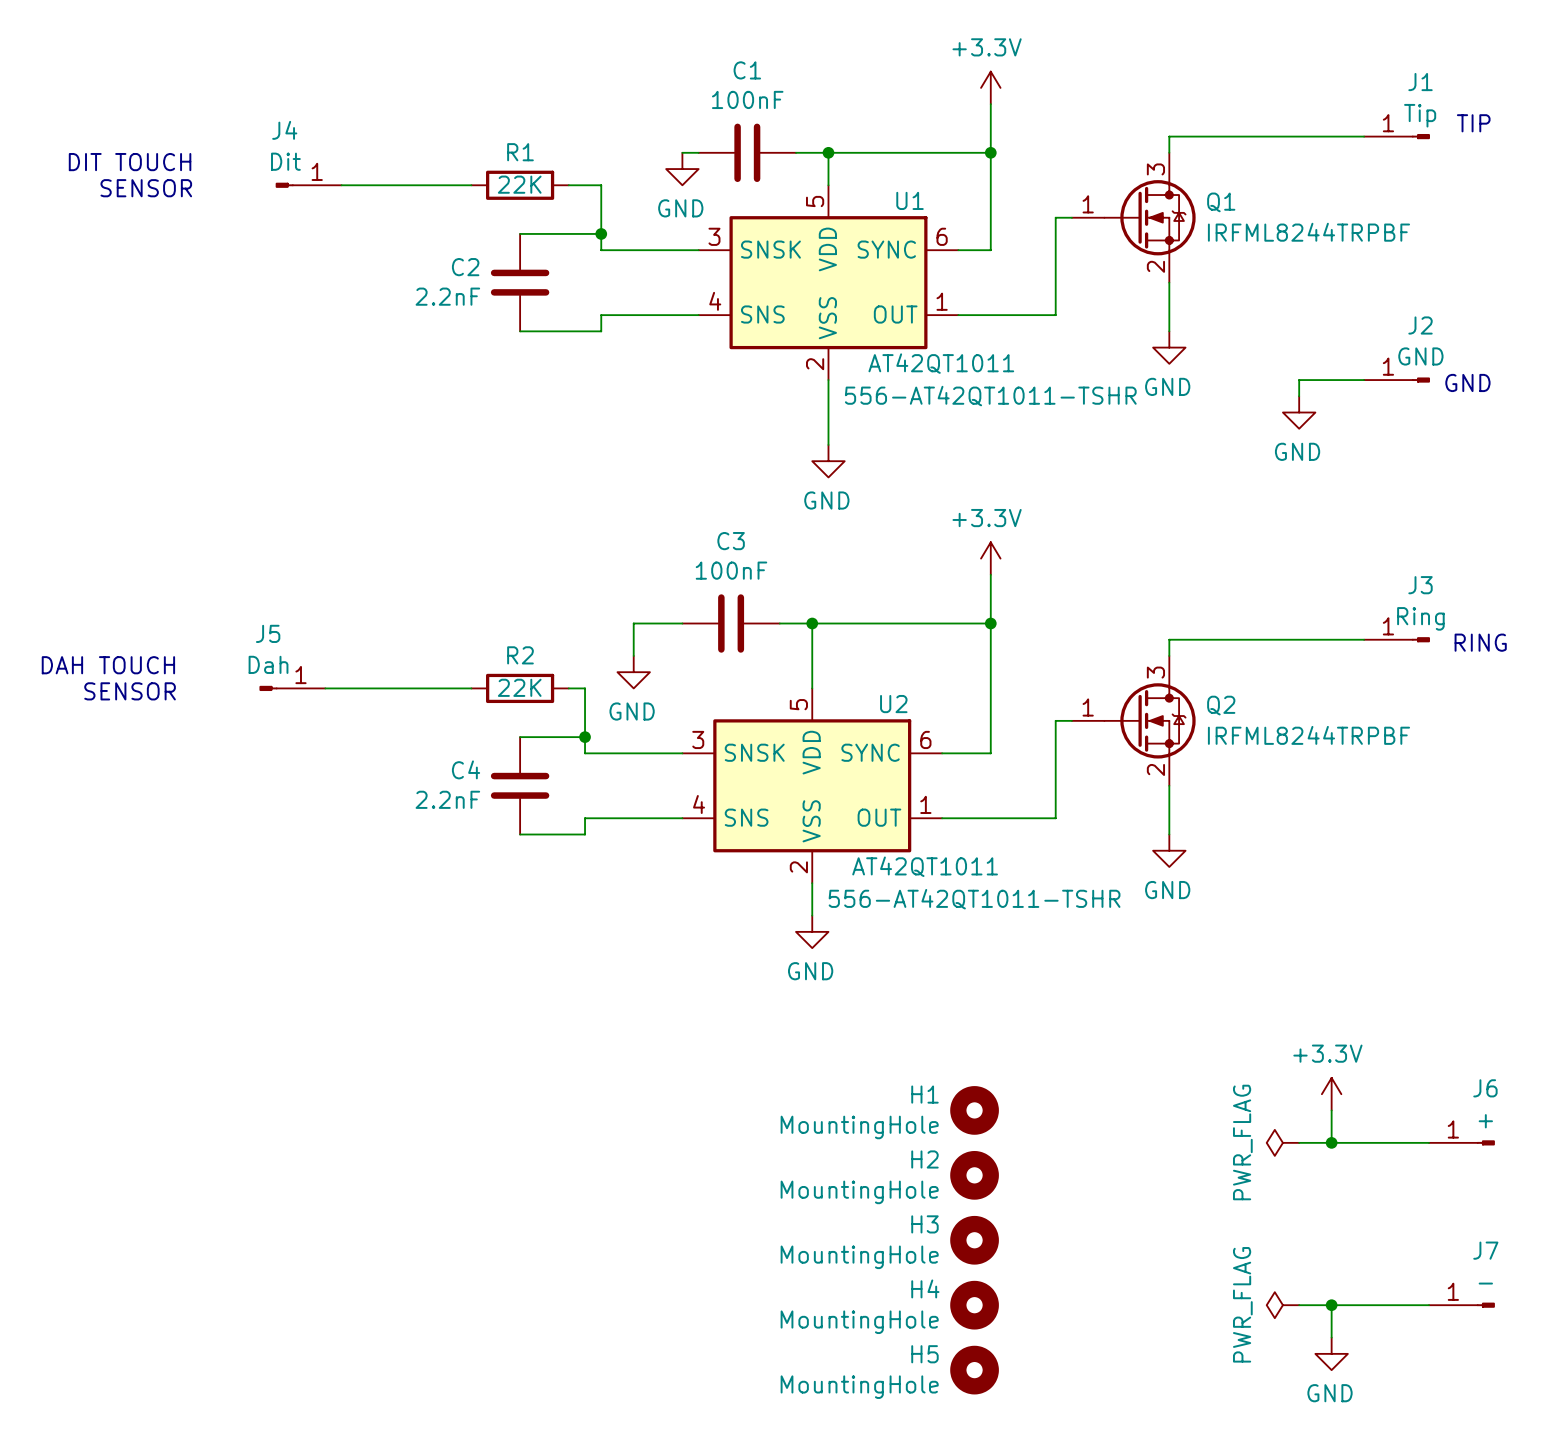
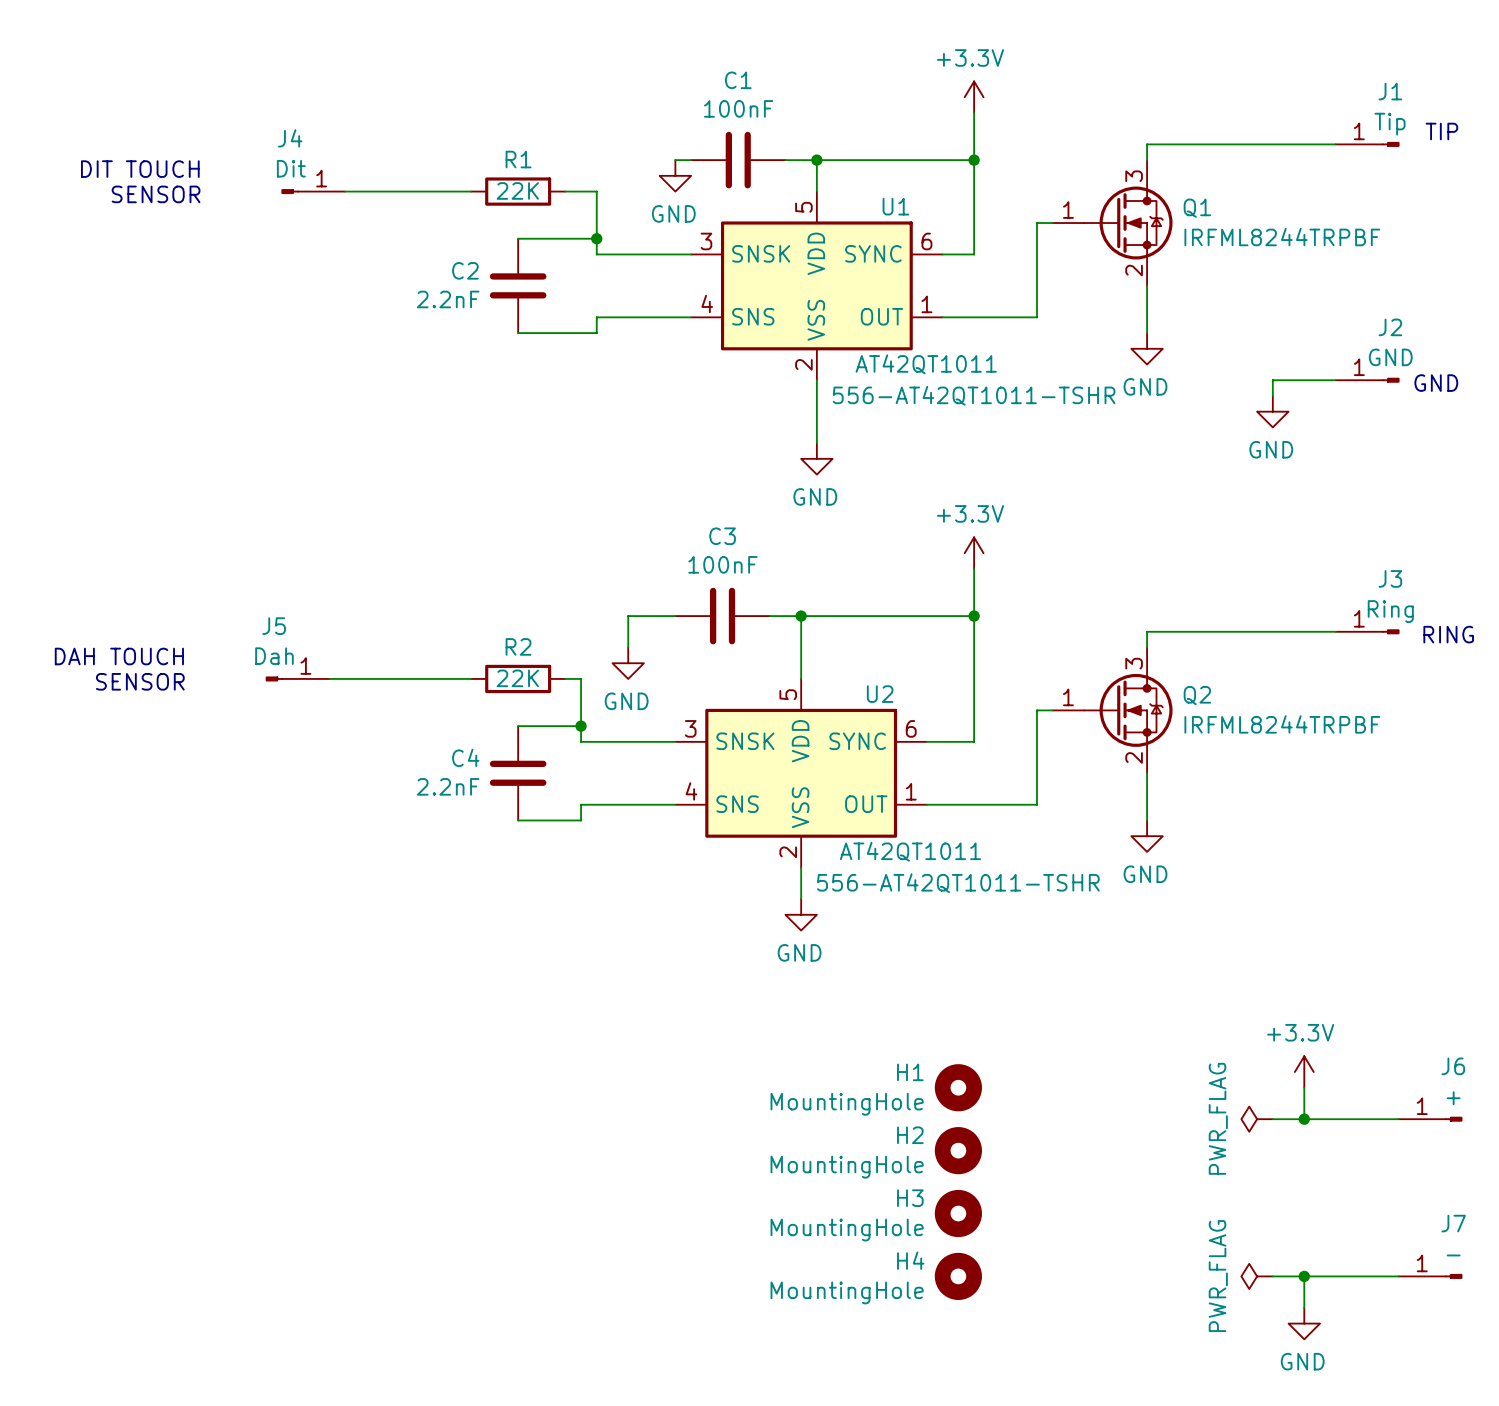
H5: MountingHole (974, 1370) -> none

